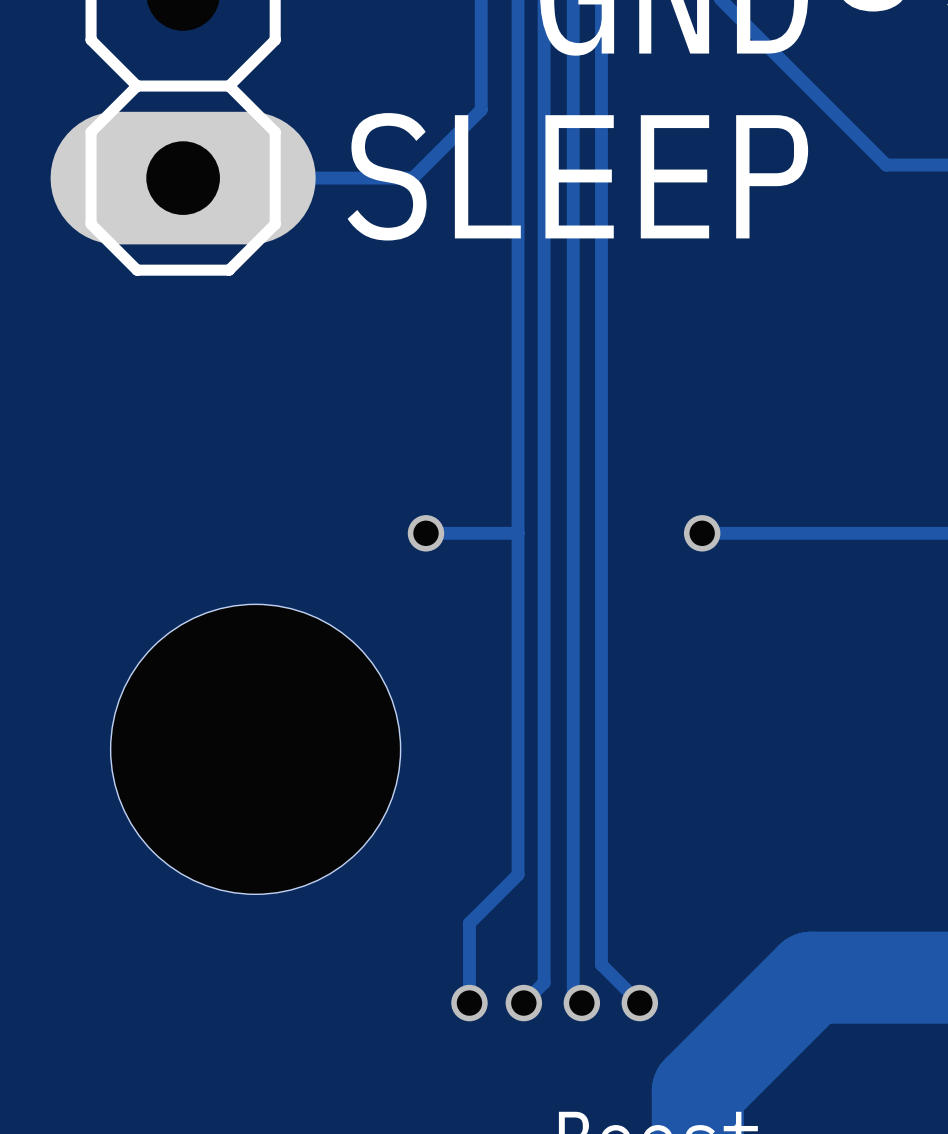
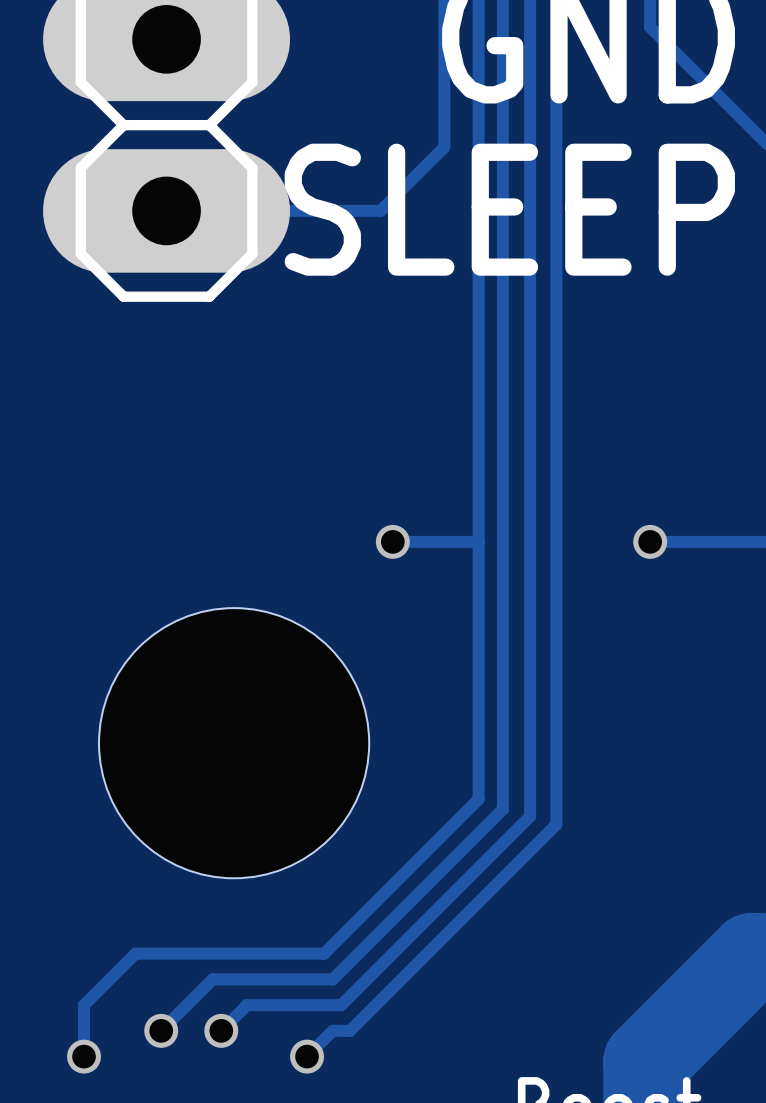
track: (518, 809) (518, 874) (469, 923) (469, 1003) -> (478, 799) (324, 953) (135, 953) (84, 1005) (84, 1056)
track: (544, 820) (544, 982) (523, 1003) -> (502, 809) (332, 979) (212, 979) (161, 1030)
track: (573, 827) (573, 994) (581, 1003) -> (530, 816) (341, 1005) (247, 1005) (221, 1030)
track: (601, 836) (601, 964) (639, 1003) -> (556, 824) (349, 1030) (332, 1030) (307, 1056)
via: (469, 1003) -> none
via: (523, 1003) -> none
via: (581, 1003) -> none
via: (639, 1003) -> none
via: none -> (161, 1030)
via: none -> (221, 1030)
via: none -> (84, 1056)
via: none -> (307, 1056)

